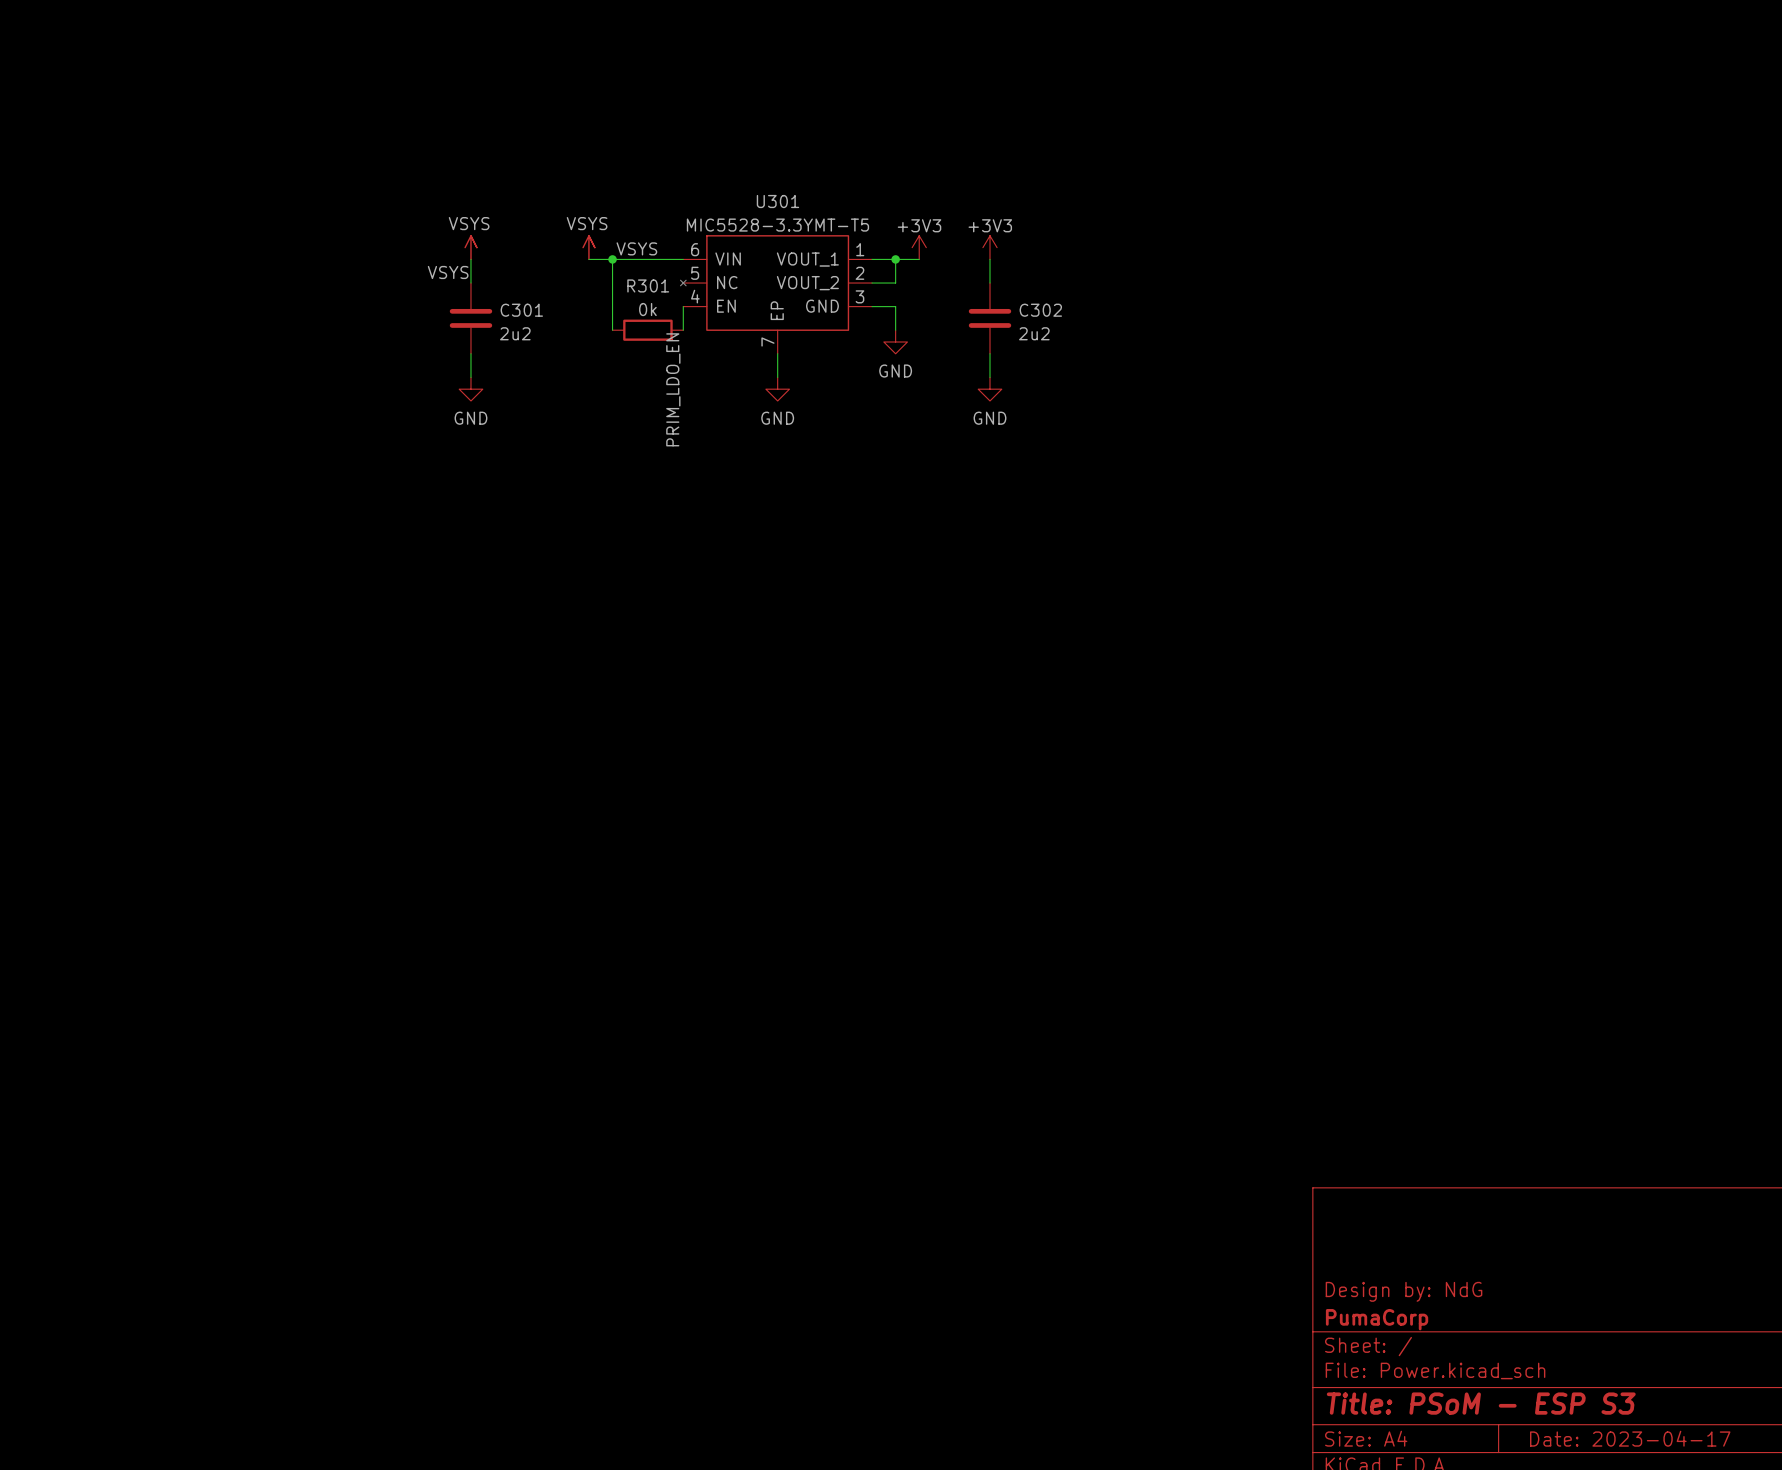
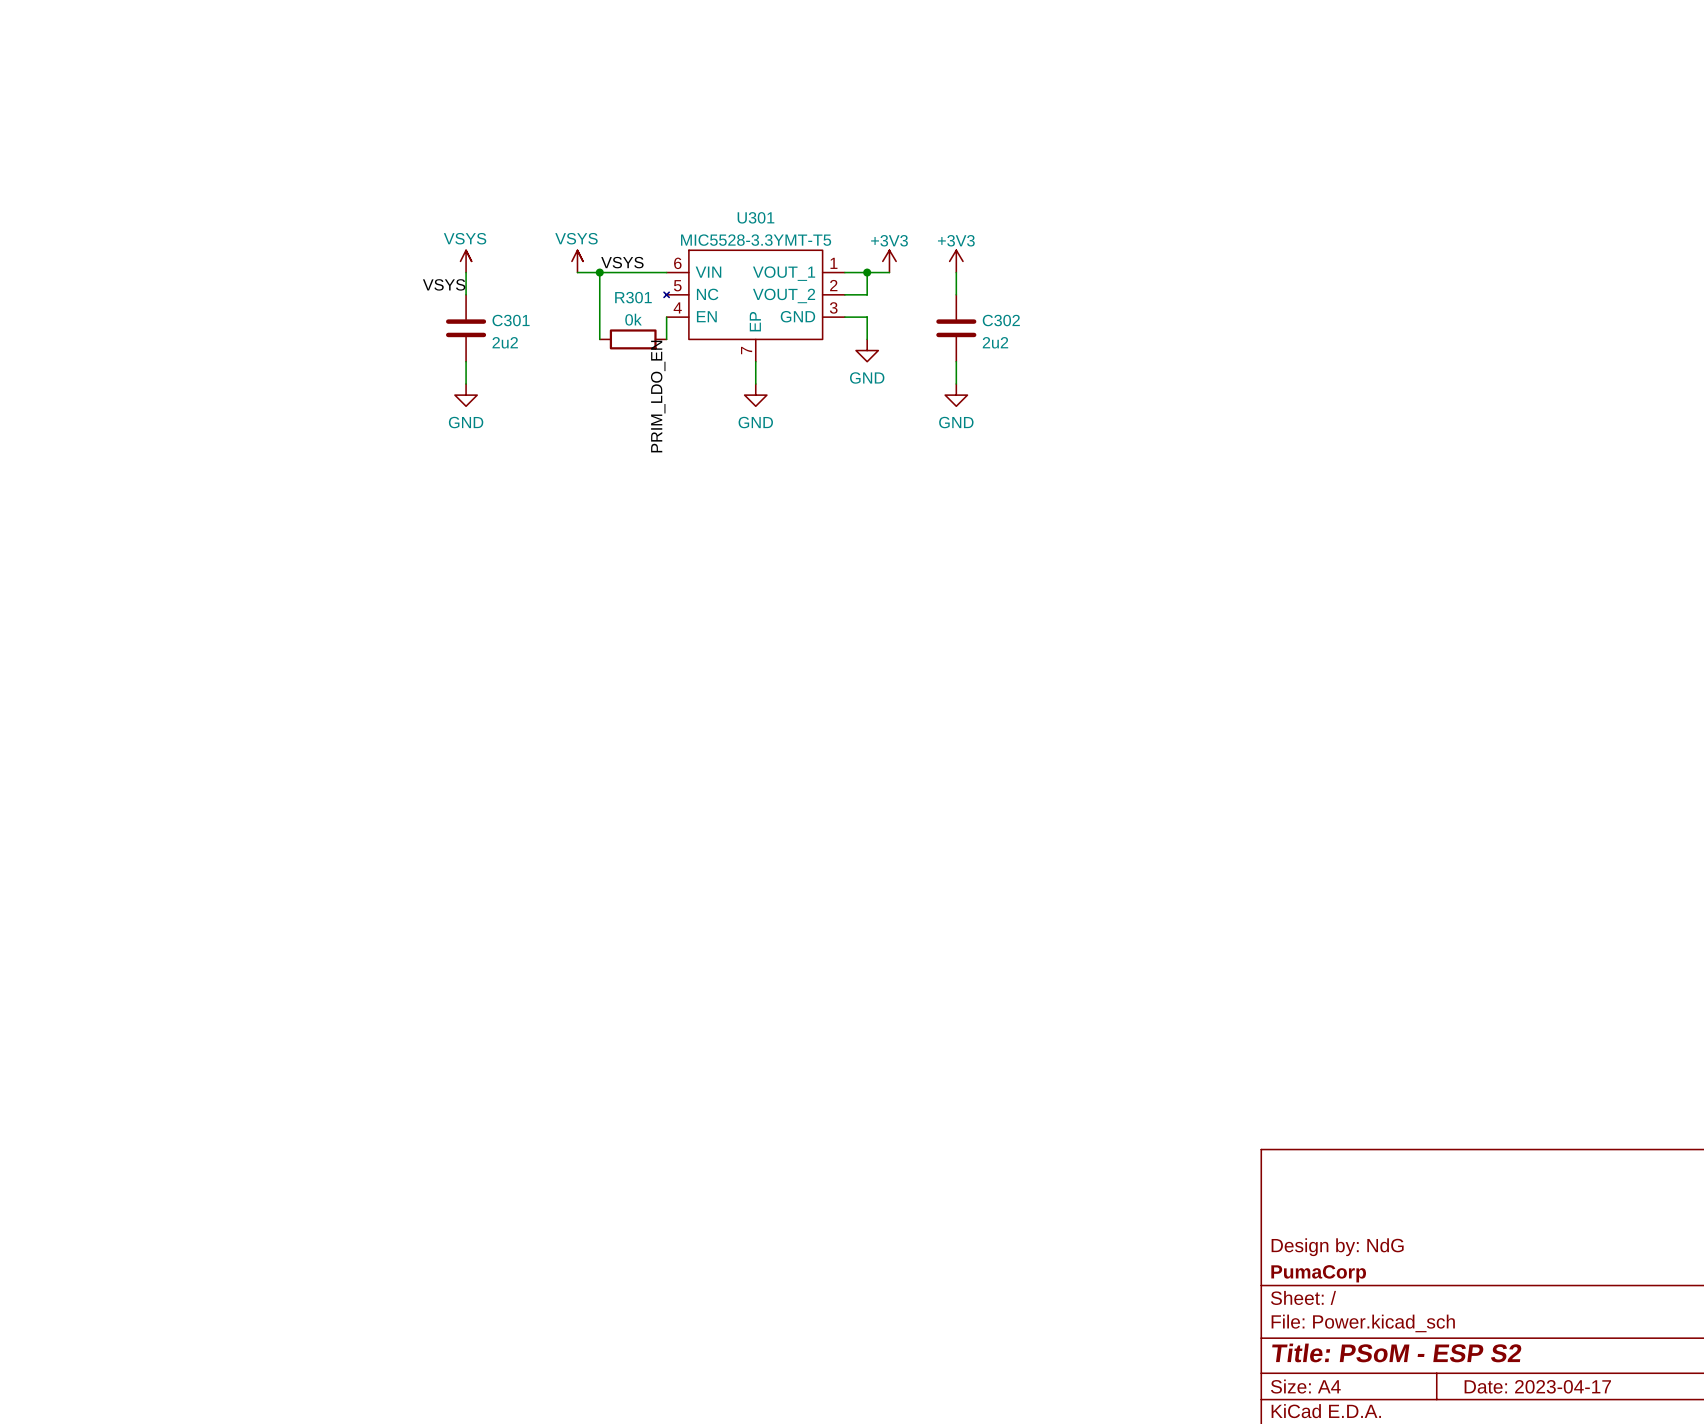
title block: Title: PSoM - ESP S3 (1481, 1403) -> Title: PSoM - ESP S2 (1396, 1352)

